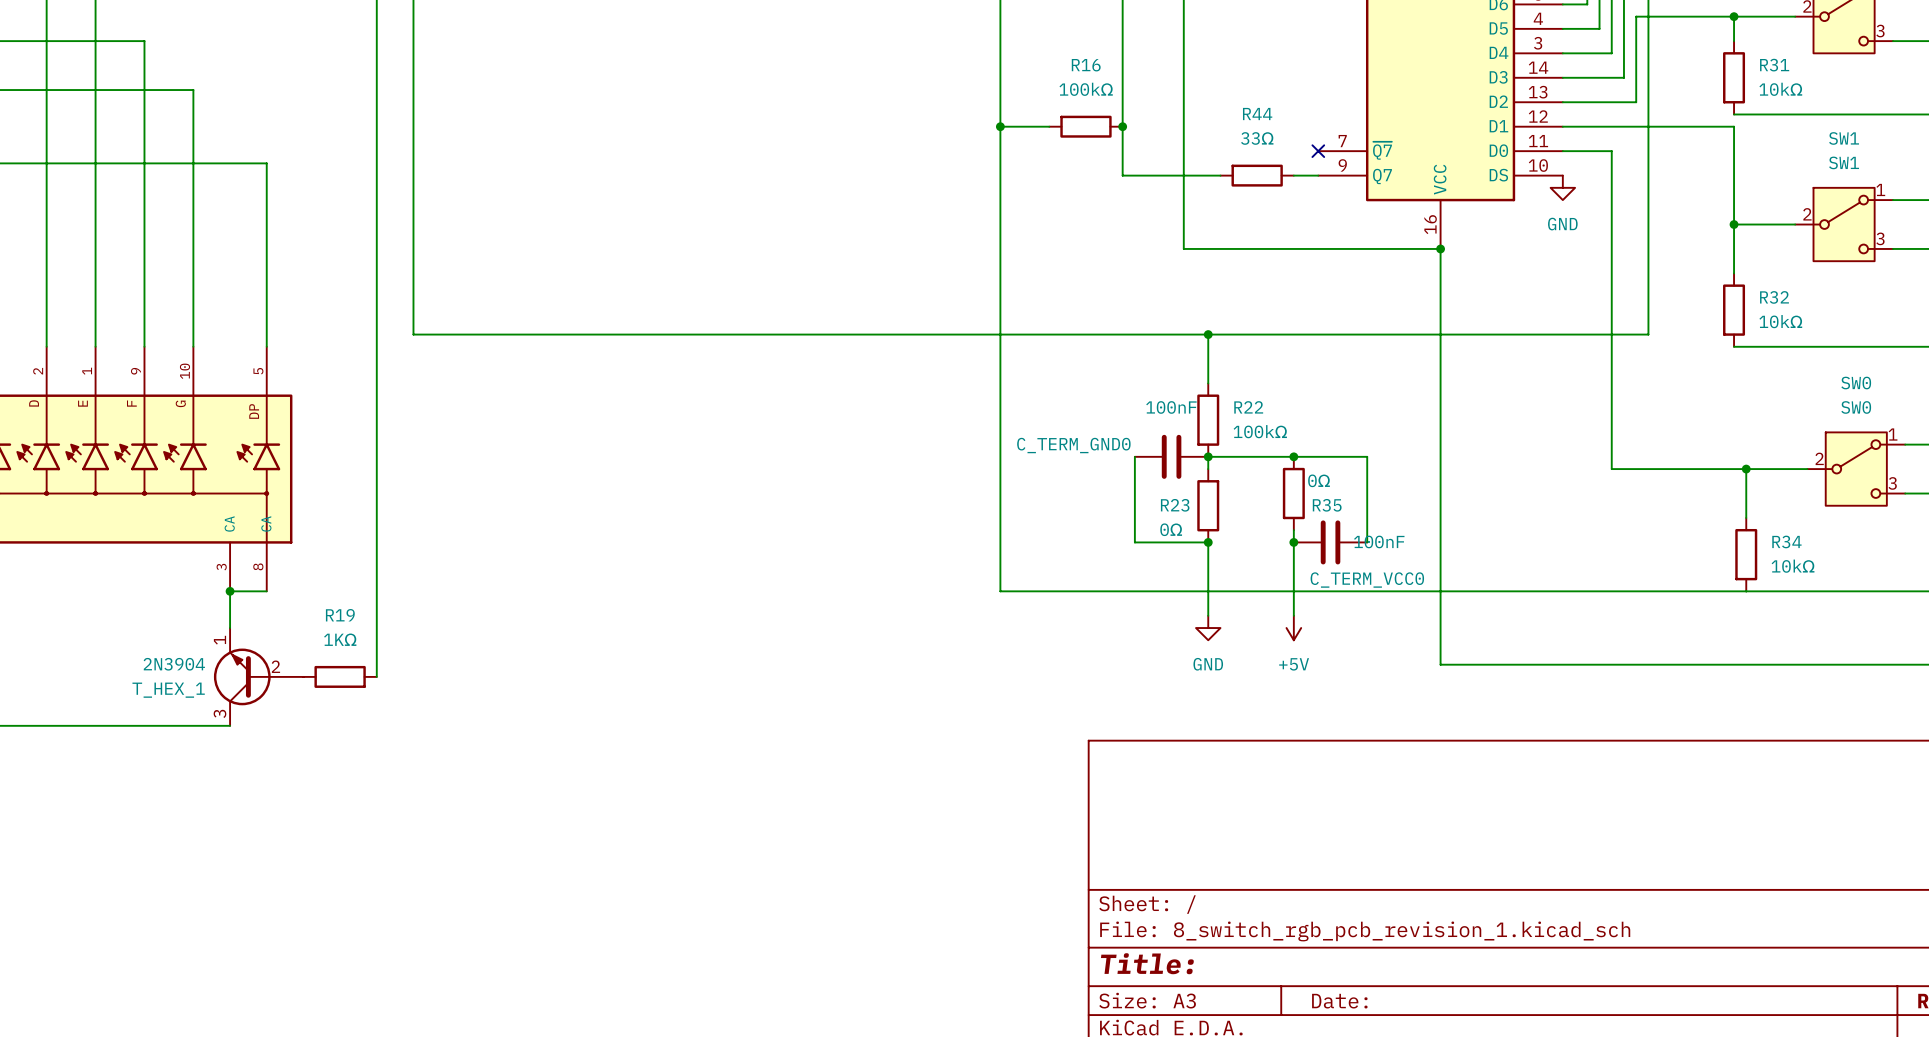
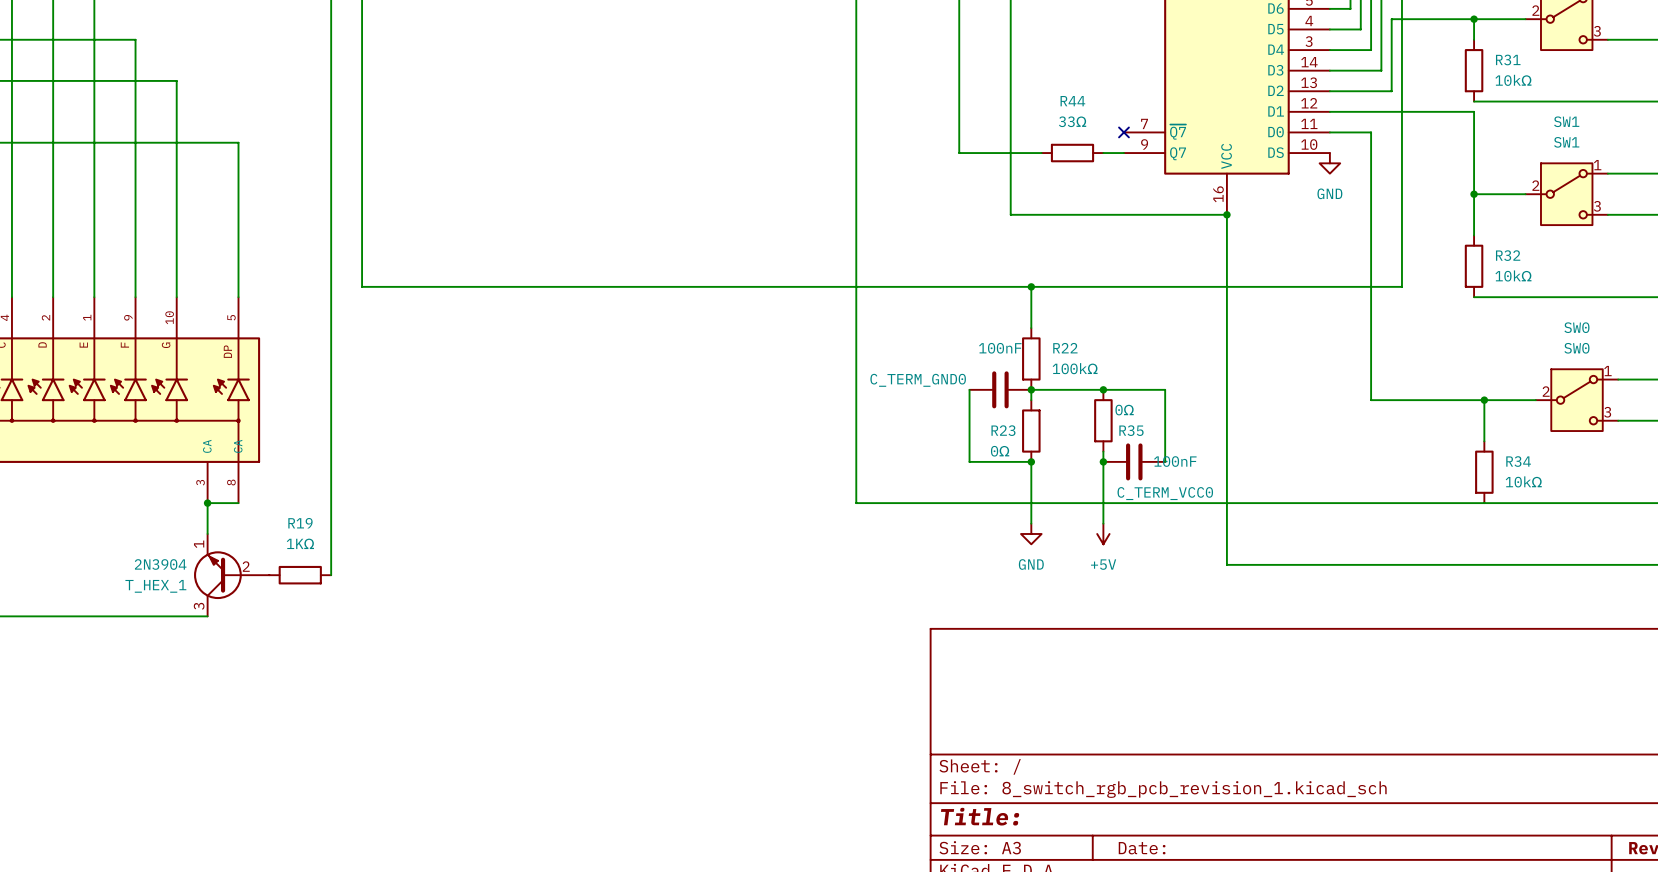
wire: (1000, 126) (1049, 126) -> none
junction: (1000, 126) -> none
R16: 100kΩ (1085, 126) -> none
junction: (1122, 126) -> none

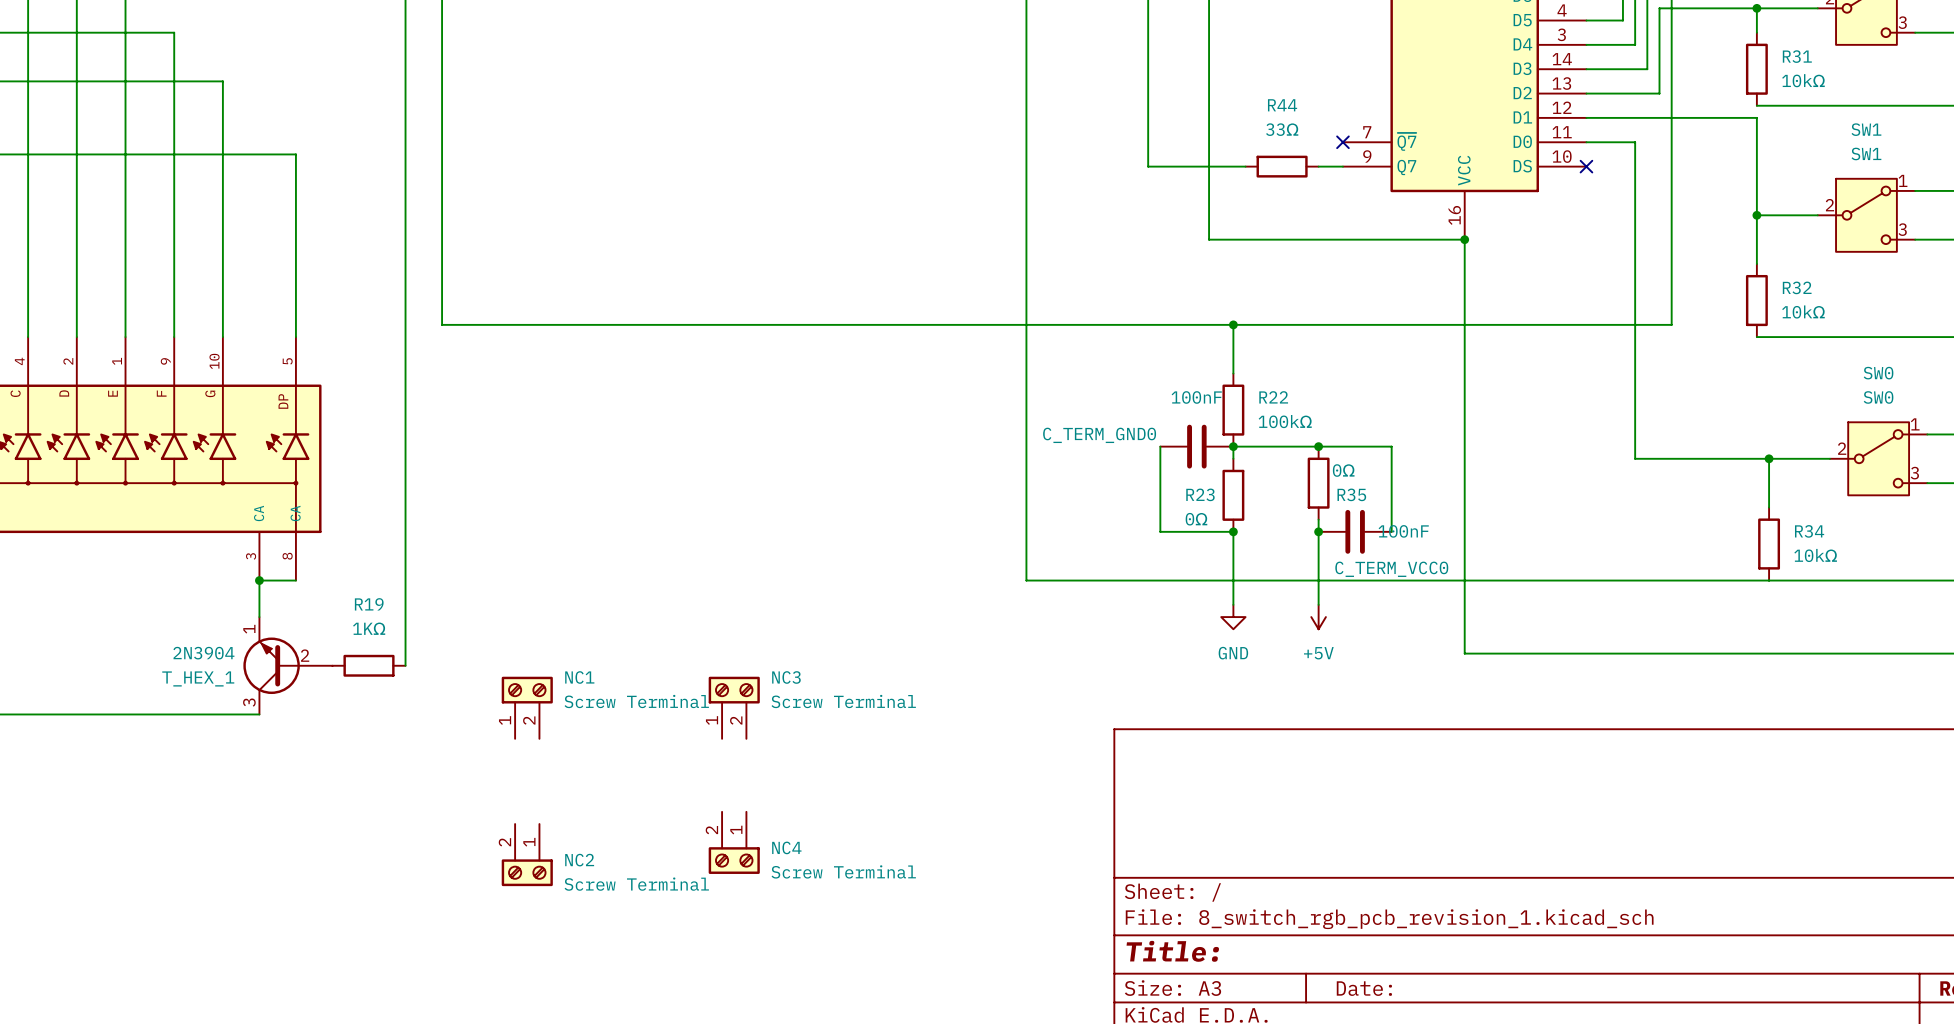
no-connect mark: none -> (1586, 166)
power symbol: GND (1329, 163) -> none
NC1: none -> Screw Terminal (527, 707)
NC3: none -> Screw Terminal (734, 707)
NC4: none -> Screw Terminal (734, 842)
NC2: none -> Screw Terminal (527, 855)

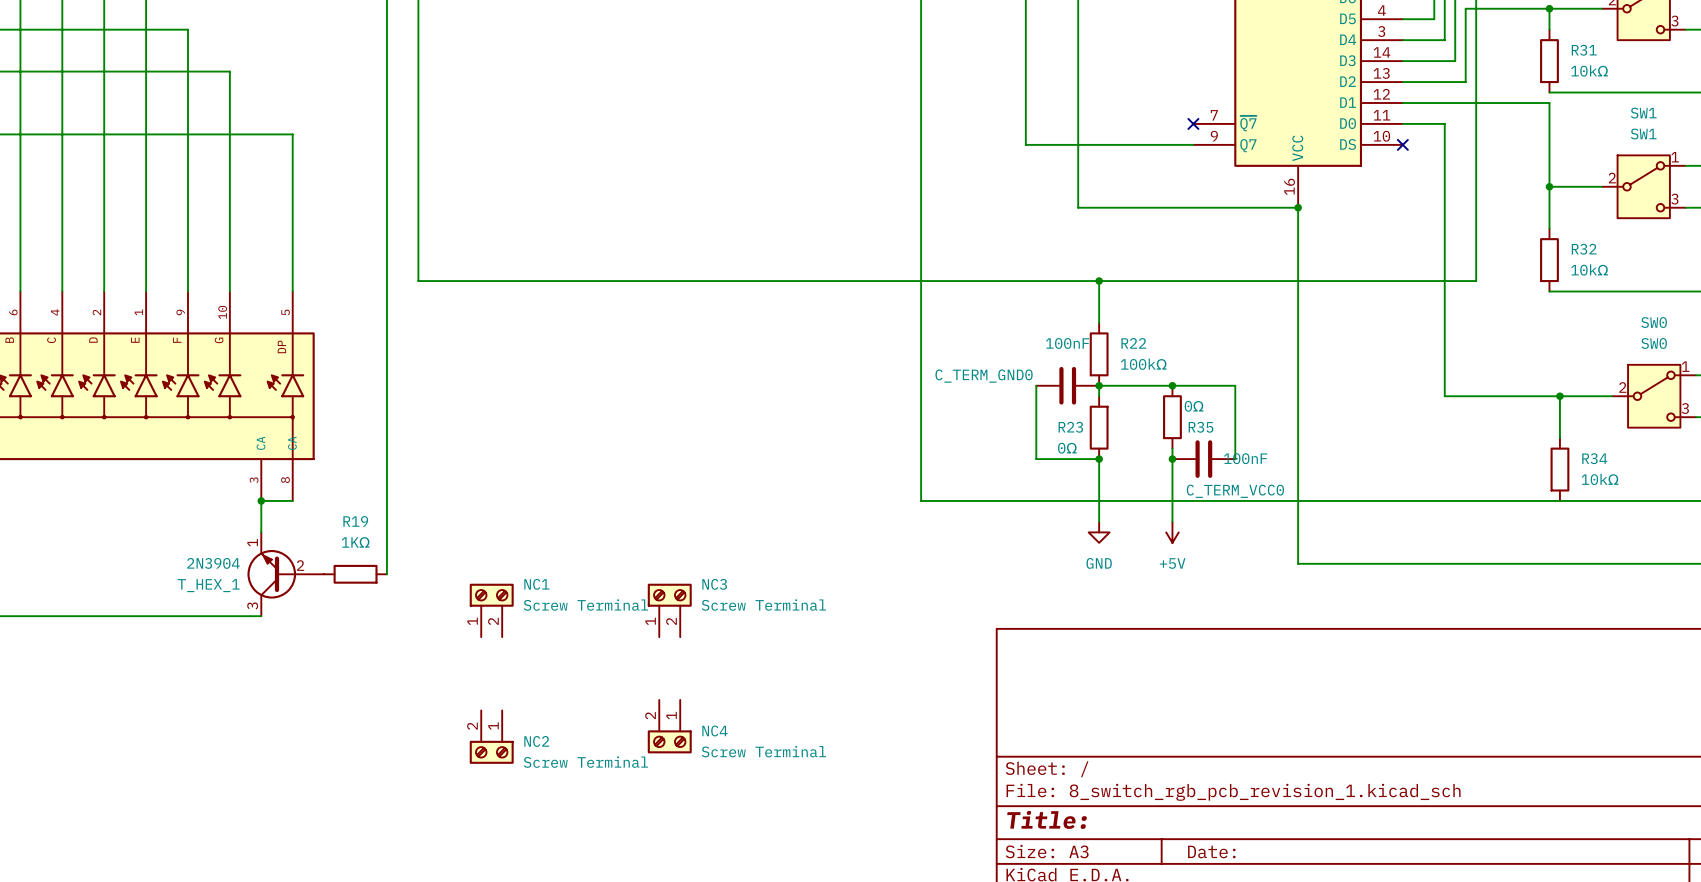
wire: none -> (1109, 144) (1172, 144)
R44: 33Ω (1282, 166) -> none

